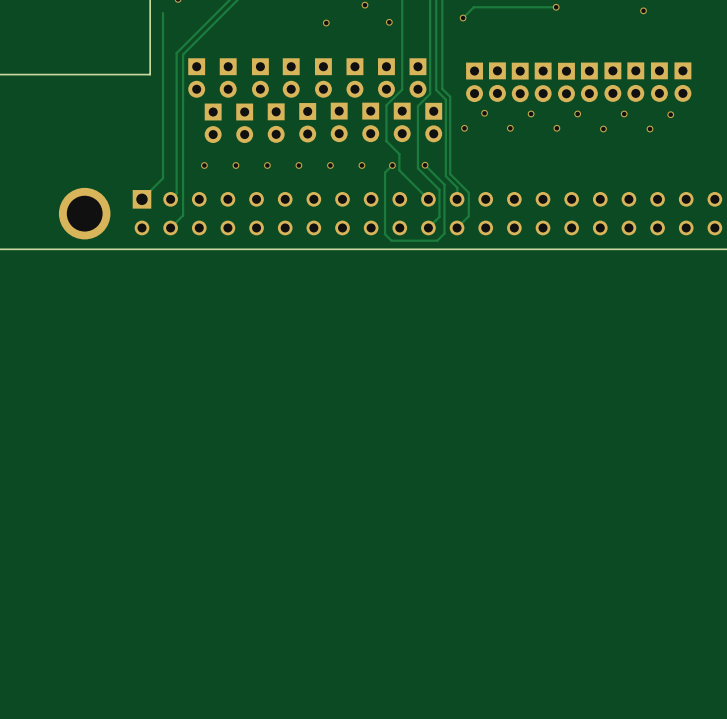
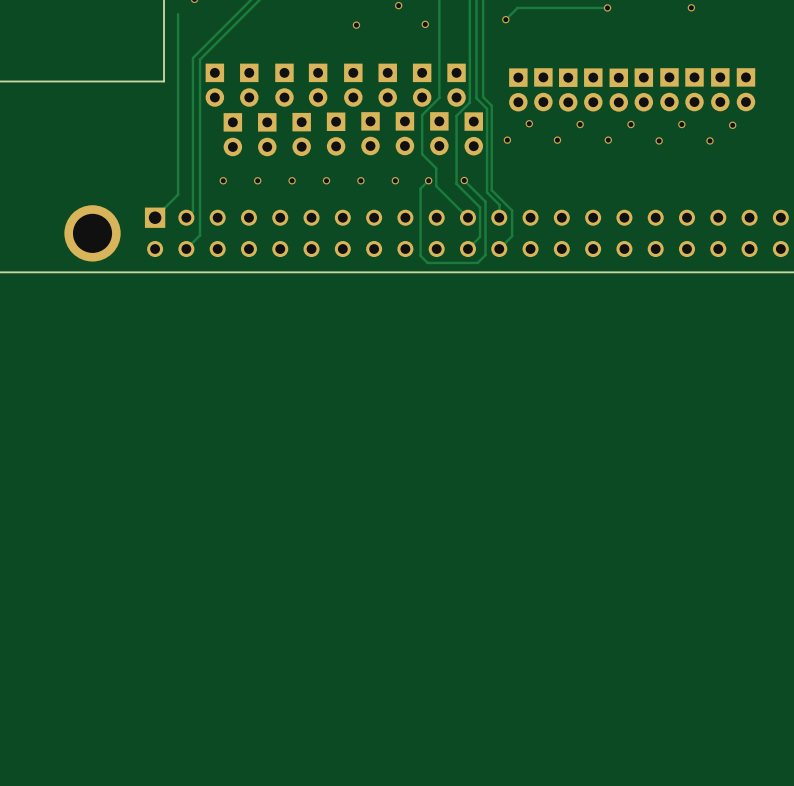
via: none -> (691, 7)
via: (643, 10) -> none

